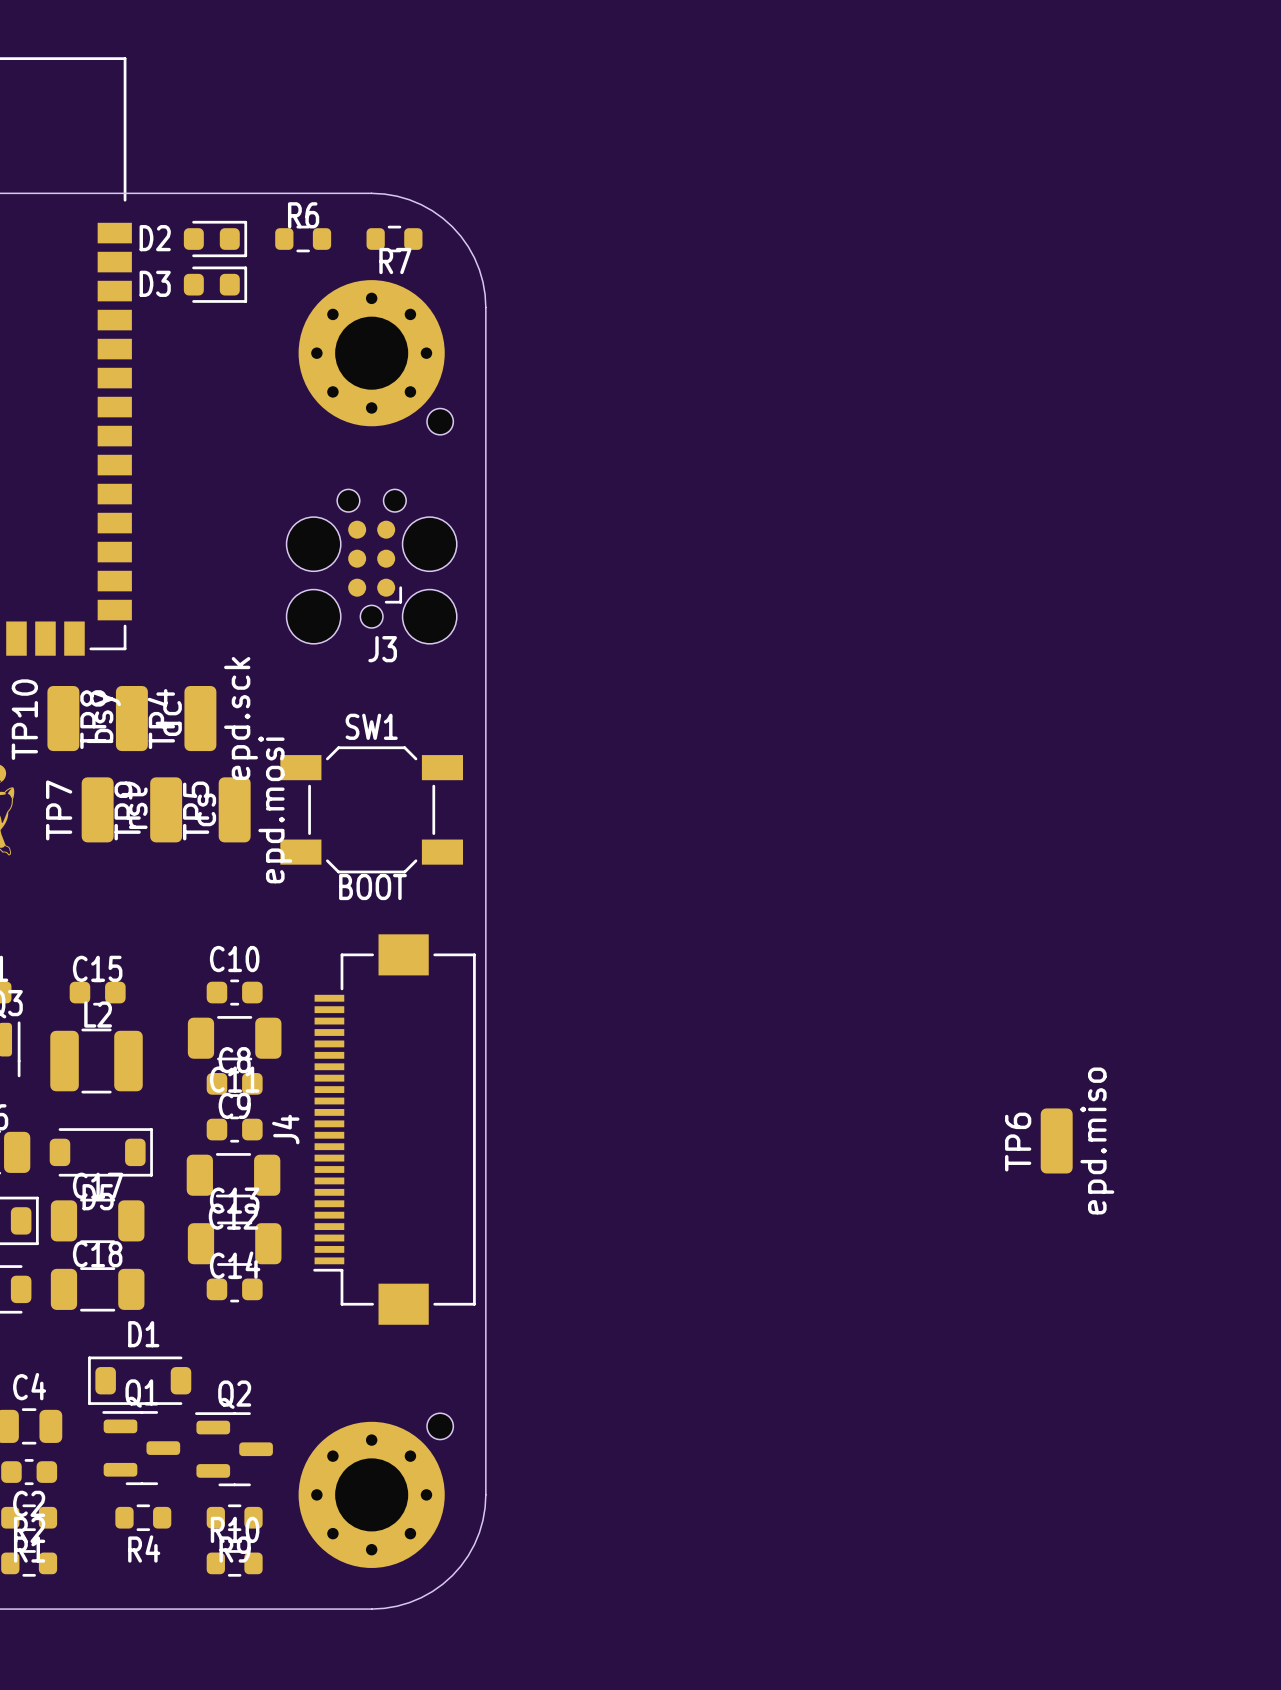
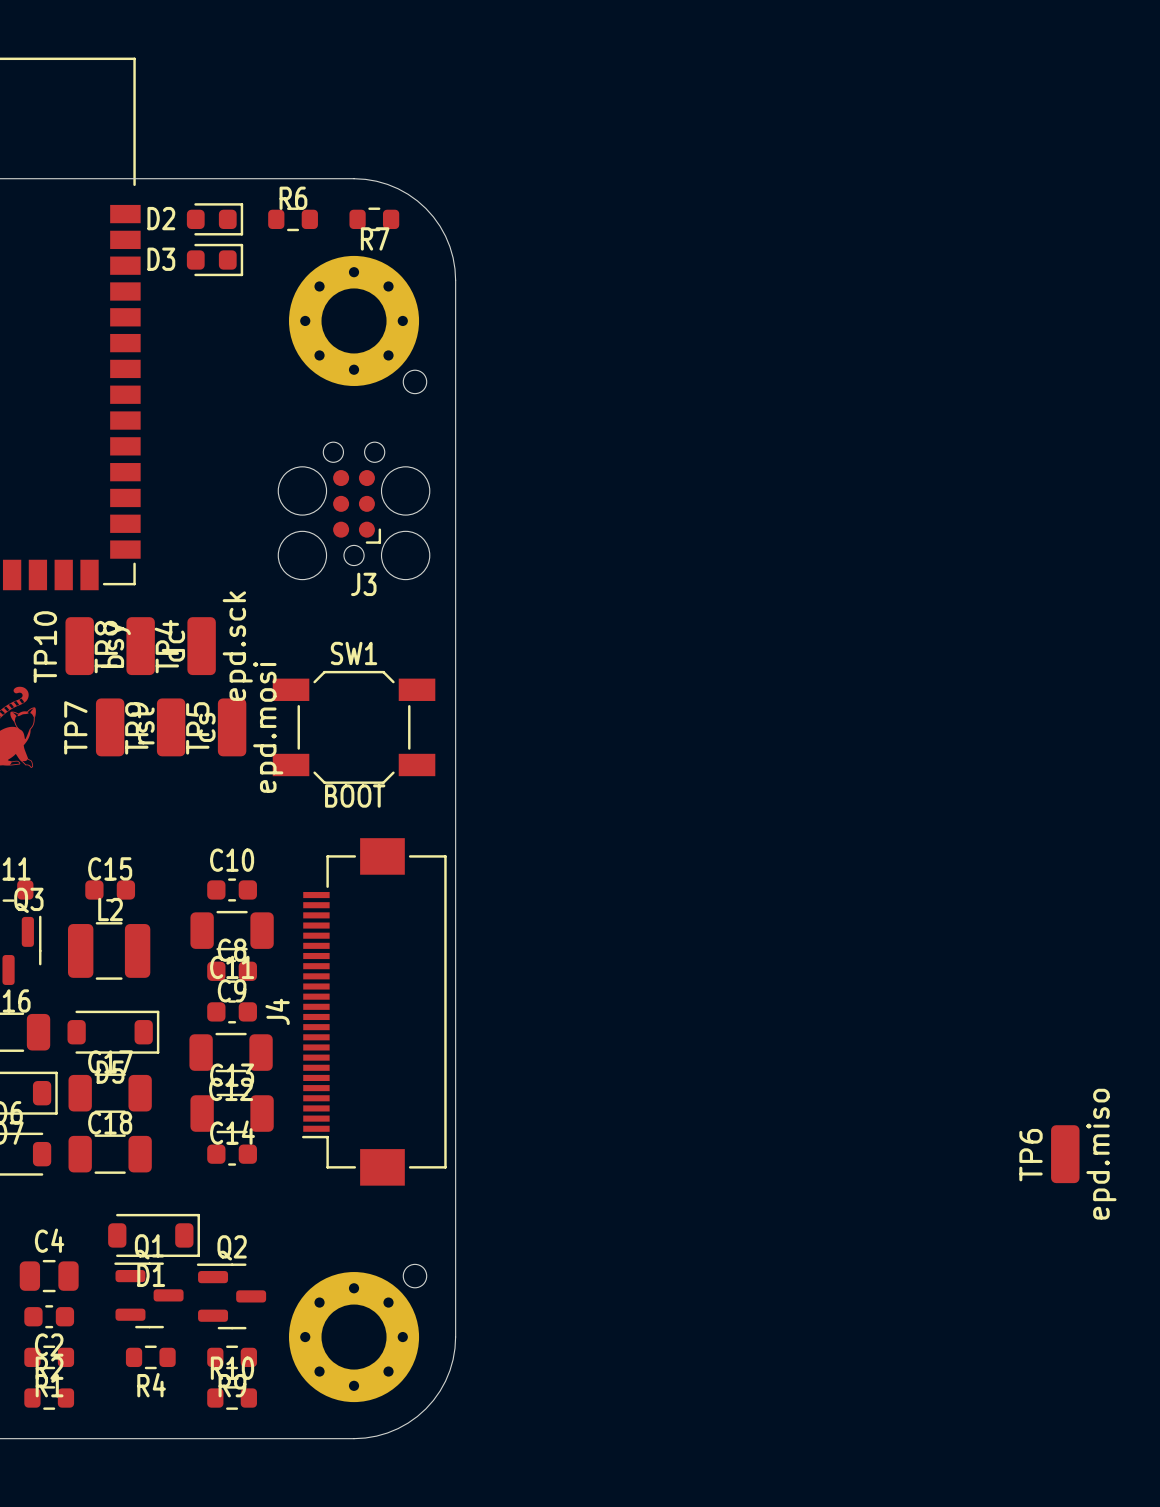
TP6 position: (1056, 1140) -> (1065, 1154)
D1 rotation: 0° (139, 1380) -> 180° (154, 1235)

